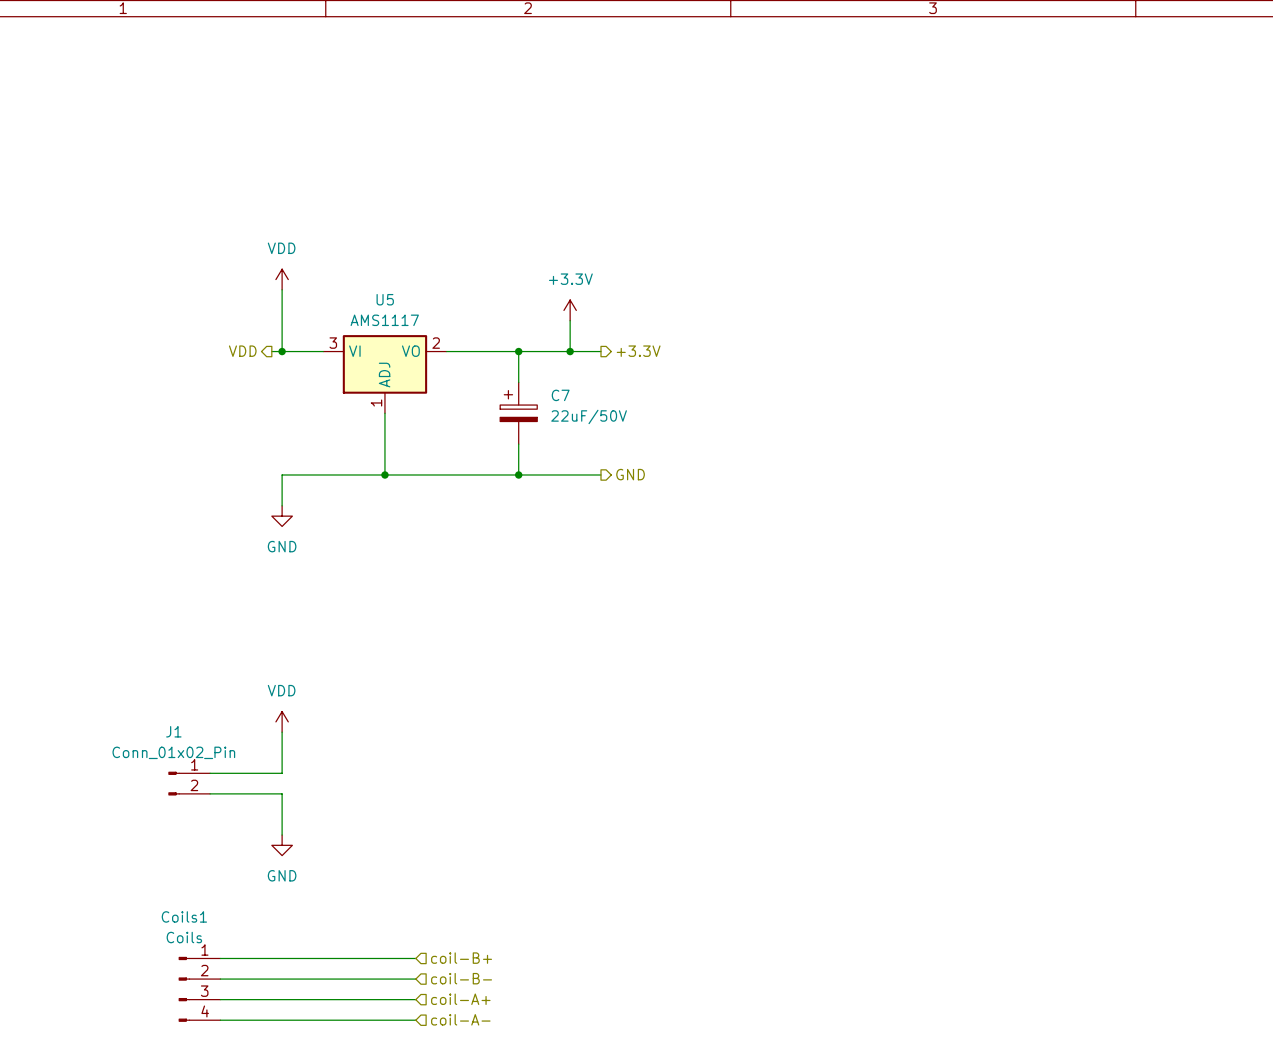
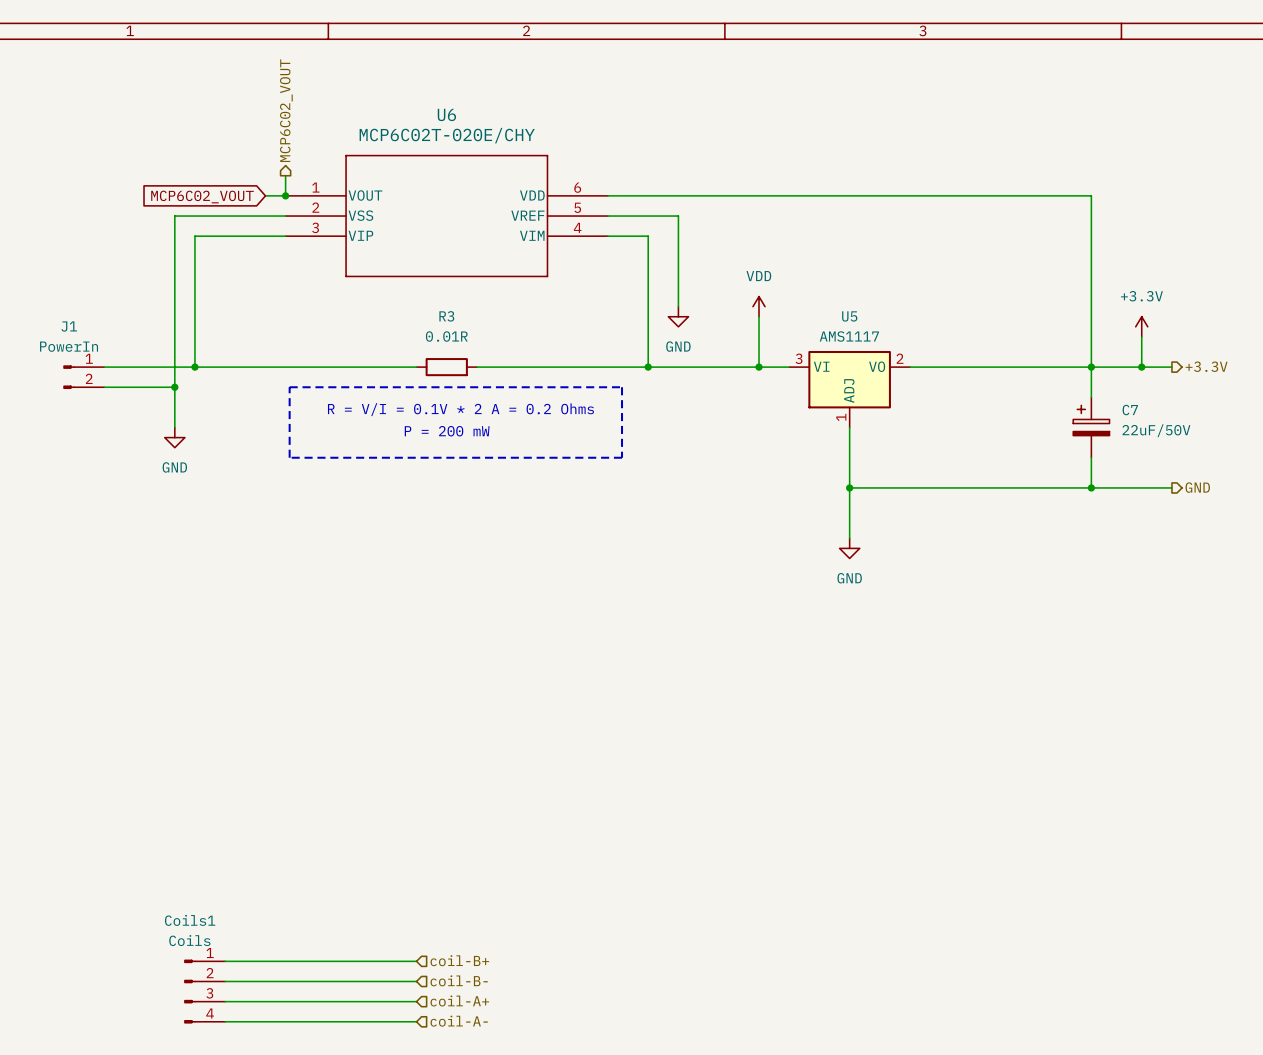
hierarchical label: none -> MCP6C02_VOUT (286, 110)
wire: none -> (285, 175) (285, 195) (265, 195)
junction: none -> (285, 195)
wire: none -> (607, 195) (1091, 195) (1091, 397)
global label: none -> MCP6C02_VOUT (202, 197)
wire: none -> (285, 216) (174, 216) (174, 427)
U6: none -> MCP6C02T-020E/CHY (446, 216)
wire: none -> (607, 216) (678, 216) (678, 306)
wire: none -> (285, 236) (194, 236) (194, 367)
wire: none -> (607, 236) (648, 236) (648, 367)
power symbol: VDD (282, 279) -> none
wire: (282, 289) (282, 351) -> none
power symbol: none -> VDD (759, 306)
power symbol: none -> GND (678, 316)
wire: none -> (759, 316) (759, 367)
power symbol: +3.3V (570, 310) -> none
power symbol: none -> +3.3V (1141, 326)
wire: (570, 320) (570, 351) -> none
wire: none -> (1141, 336) (1141, 367)
wire: none -> (104, 367) (275, 367)
junction: none -> (194, 367)
hierarchical label: VDD (242, 351) -> none
junction: (282, 351) -> none
wire: (446, 351) (477, 351) -> none
R3: none -> 0.01R (446, 367)
wire: (518, 351) (518, 382) -> none
junction: (518, 351) -> none
junction: (570, 351) -> none
wire: none -> (597, 367) (789, 367)
hierarchical label: +3.3V (638, 351) -> none
junction: none -> (648, 367)
junction: none -> (759, 367)
wire: none -> (910, 367) (1171, 367)
junction: none -> (1091, 367)
junction: none -> (1141, 367)
hierarchical label: none -> +3.3V (1206, 366)
wire: none -> (104, 387) (174, 387)
junction: none -> (174, 387)
line: none -> (289, 387) (622, 387) (622, 457) (289, 457) (289, 387)
U5 position: (384, 374) -> (849, 389)
text: none -> R = V/I = 0.1V * 2 A = 0.2 Ohms (460, 409)
wire: (384, 413) (384, 474) -> none
C7 position: (518, 413) -> (1091, 427)
wire: none -> (849, 427) (849, 538)
text: none -> P = 200 mW (447, 431)
wire: (518, 444) (518, 474) -> none
wire: none -> (1091, 457) (1091, 487)
junction: (384, 474) -> none
junction: (518, 474) -> none
wire: (601, 474) (282, 474) (282, 505) -> none
hierarchical label: GND (630, 474) -> none
wire: none -> (849, 487) (1171, 487)
junction: none -> (849, 487)
junction: none -> (1091, 487)
hierarchical label: none -> GND (1197, 487)
power symbol position: GND (282, 516) -> GND (174, 437)
power symbol: none -> GND (849, 548)
power symbol: VDD (282, 721) -> none
wire: (282, 732) (282, 773) (210, 773) -> none
J1 value: Conn_01x02_Pin (173, 752) -> PowerIn (69, 346)
J1 position: (189, 783) -> (83, 377)
wire: (210, 793) (282, 793) (282, 835) -> none
power symbol: GND (282, 845) -> none

